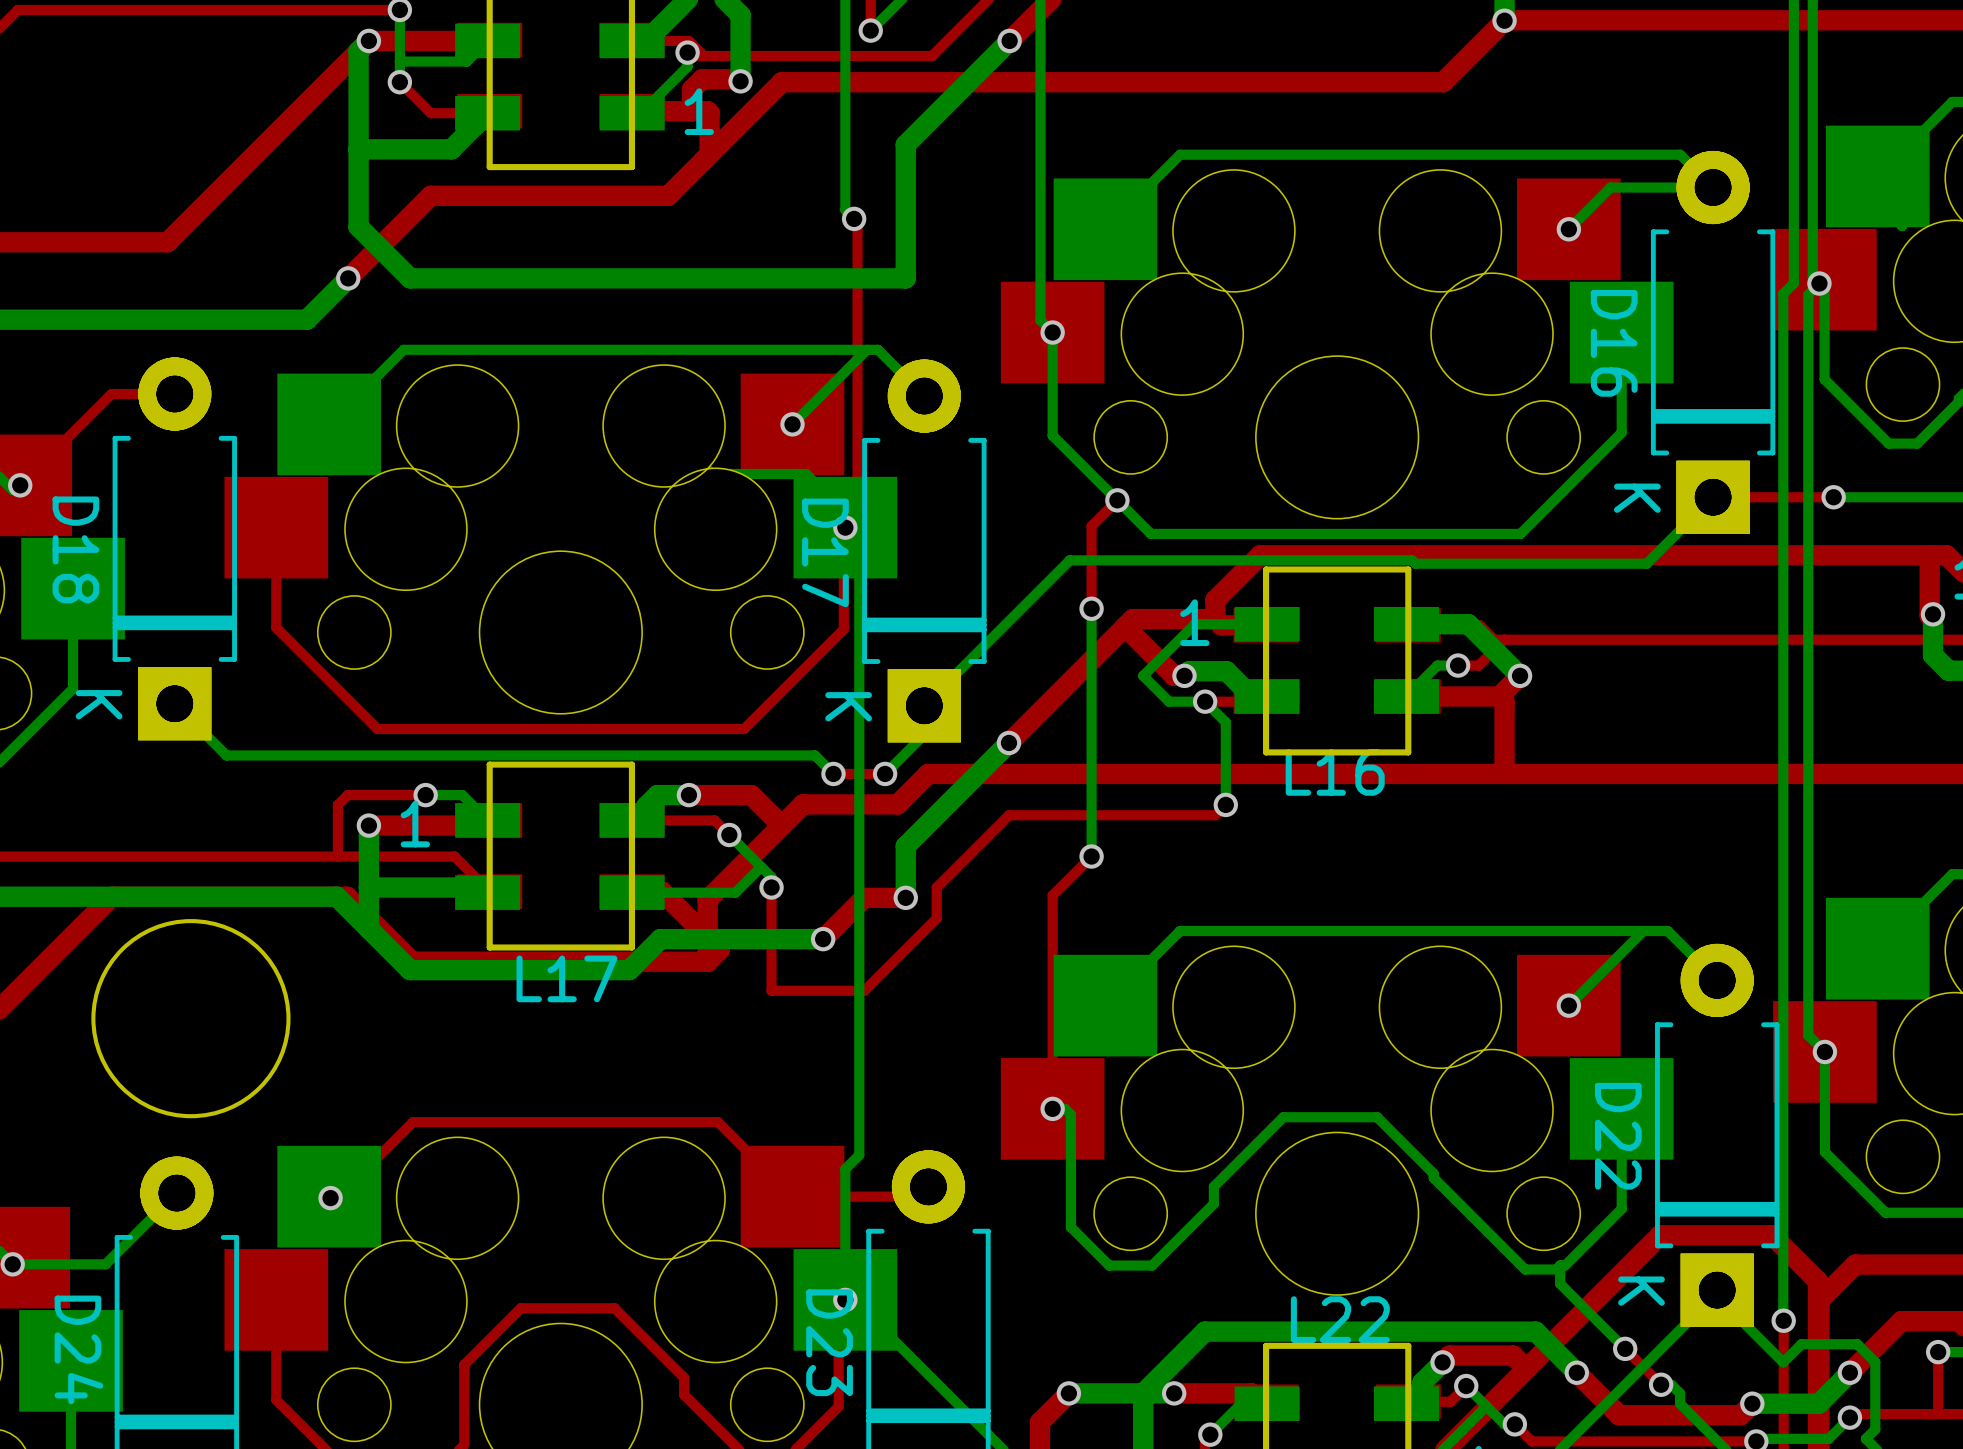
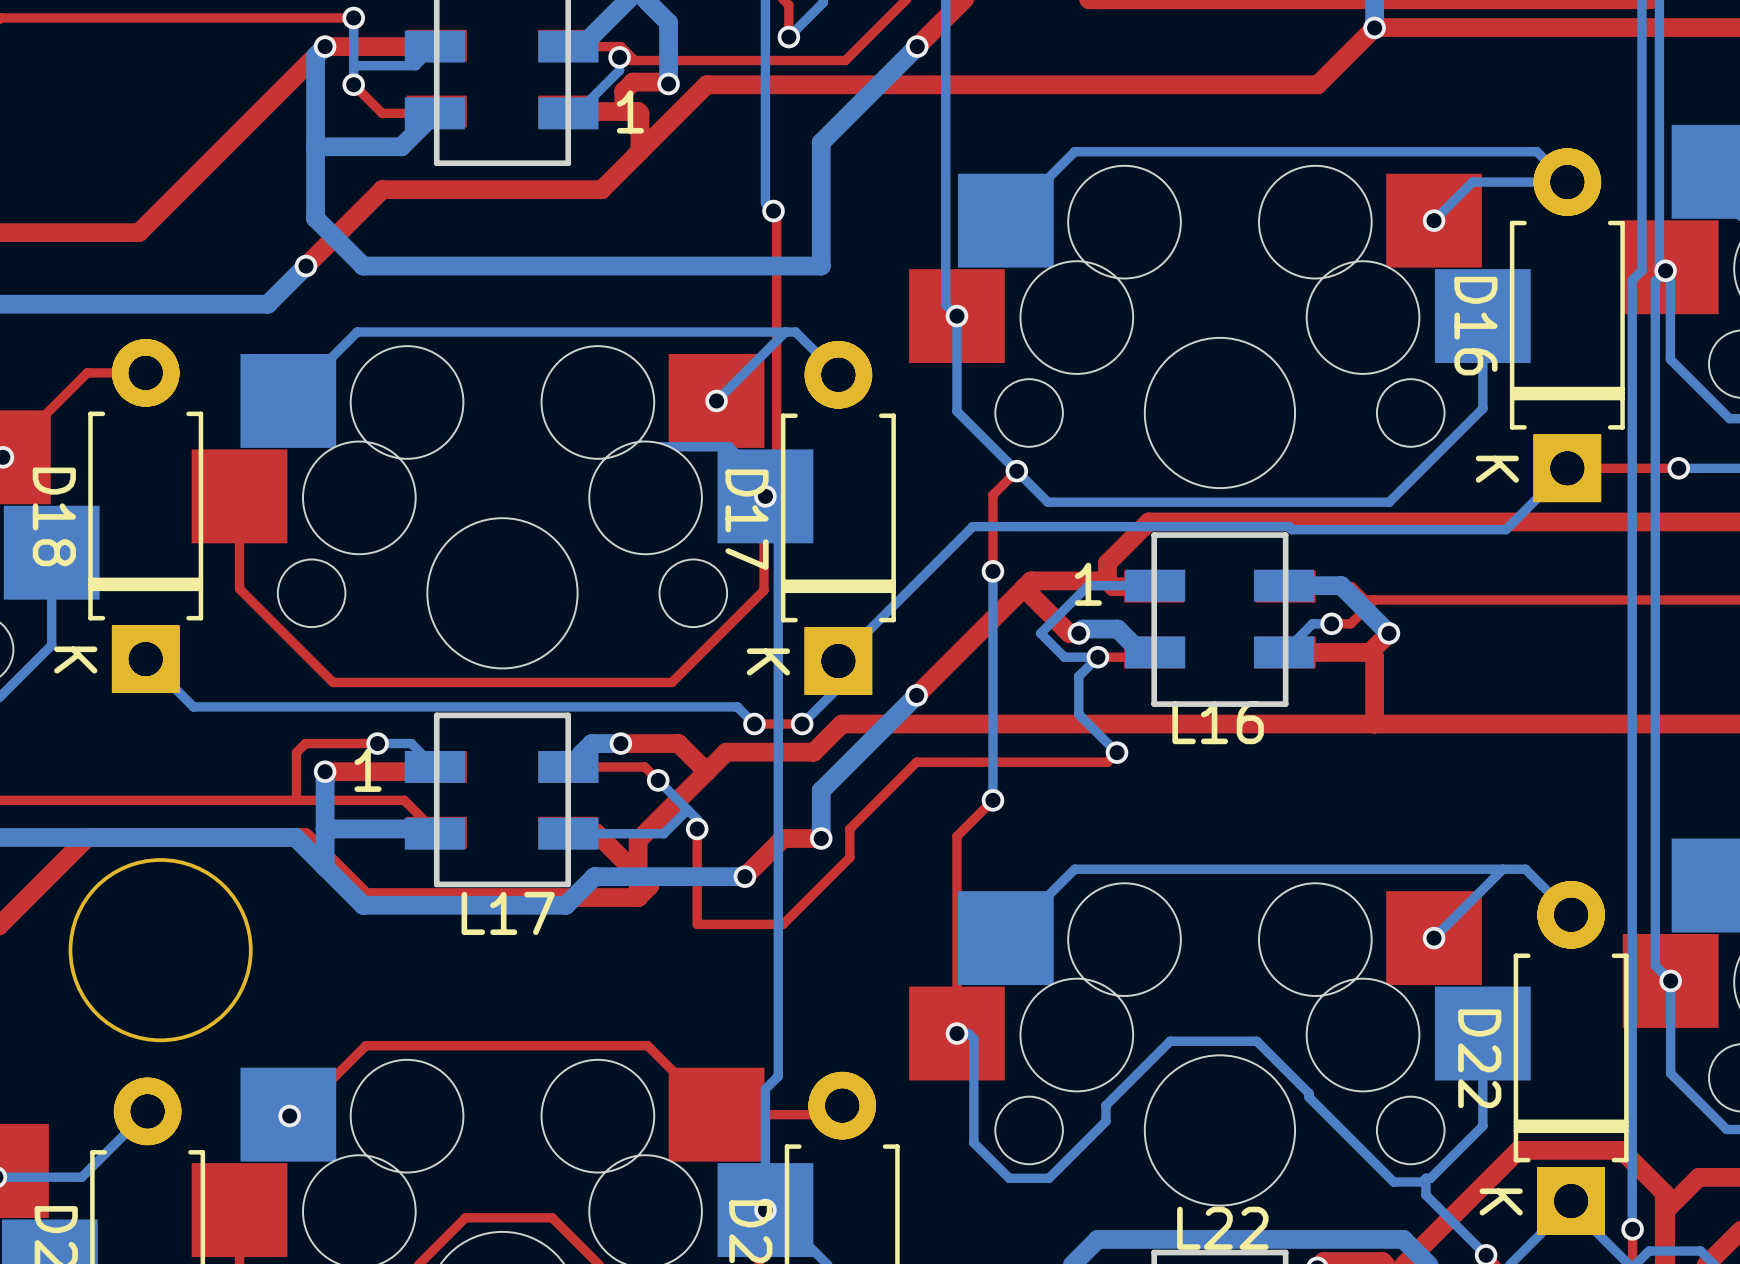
bottom track: (1205, 701) (1225, 722) (1225, 804) -> (1097, 657) (1078, 676) (1078, 714) (1117, 752)

